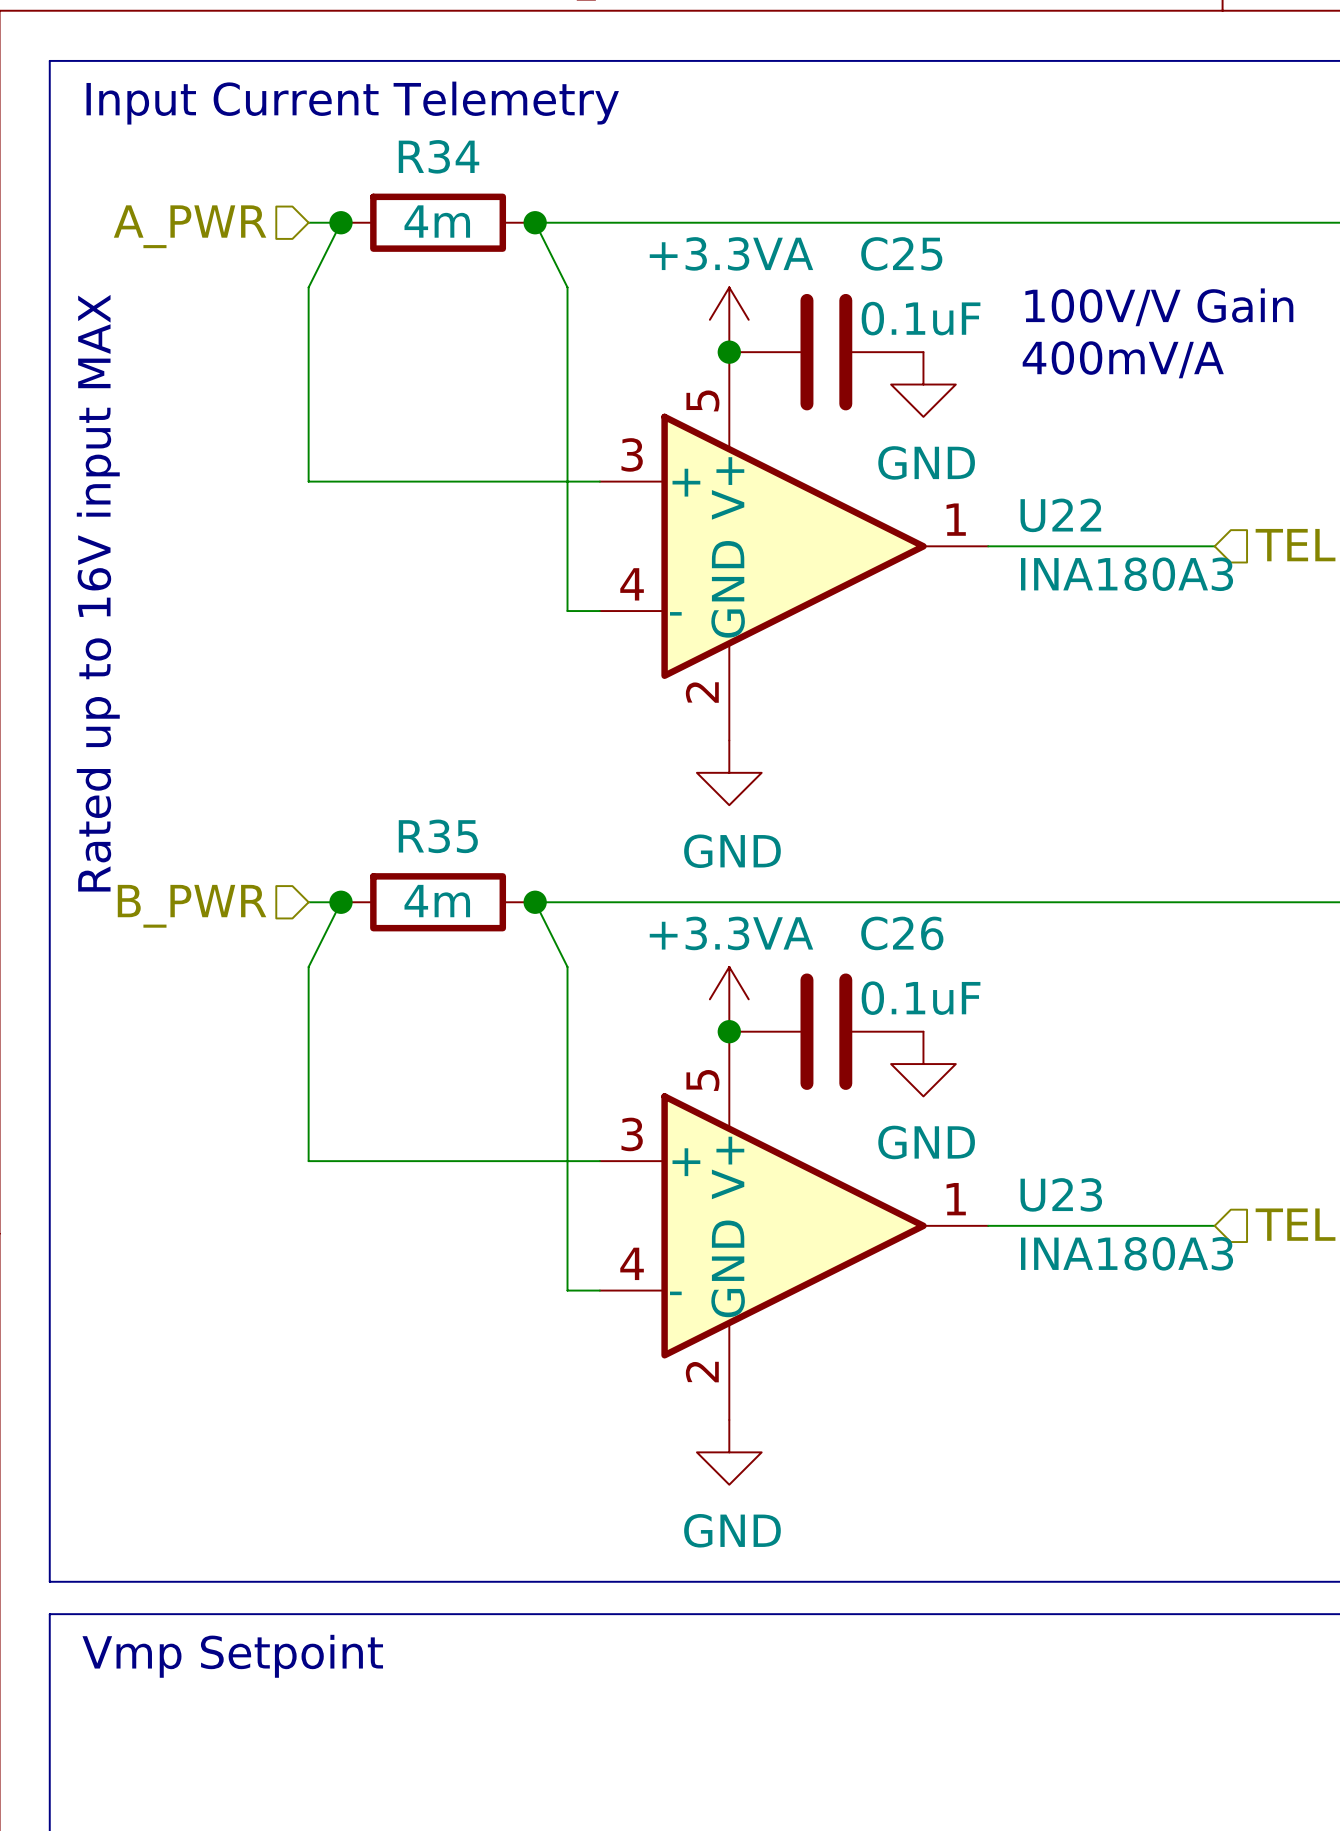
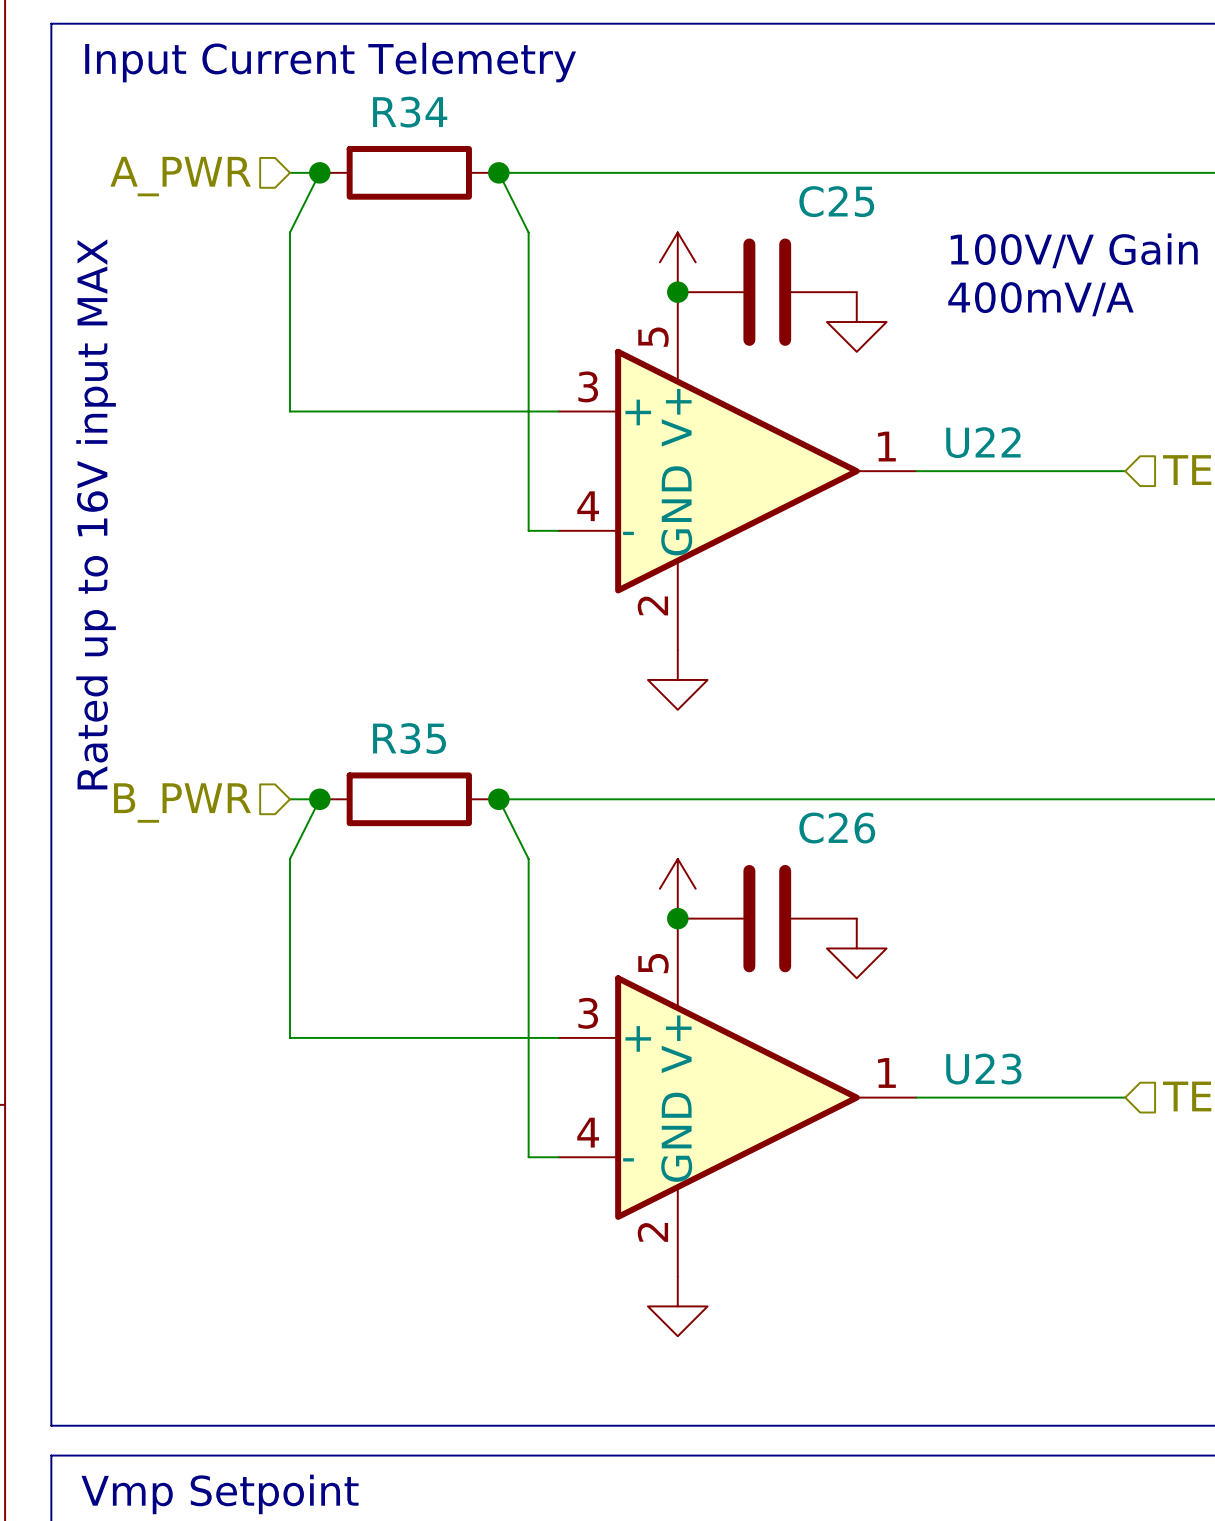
R34 value: 4m (437, 221) -> none
power symbol text: +3.3VA (731, 253) -> none
C25 value: 0.1uF (921, 318) -> none
power symbol text: GND (926, 462) -> none
U22 value: INA180A3 (1127, 574) -> none
power symbol text: GND (732, 851) -> none
R35 value: 4m (437, 901) -> none
power symbol text: +3.3VA (731, 933) -> none
C26 value: 0.1uF (921, 998) -> none
power symbol text: GND (926, 1142) -> none
U23 value: INA180A3 (1127, 1253) -> none
power symbol text: GND (732, 1530) -> none

